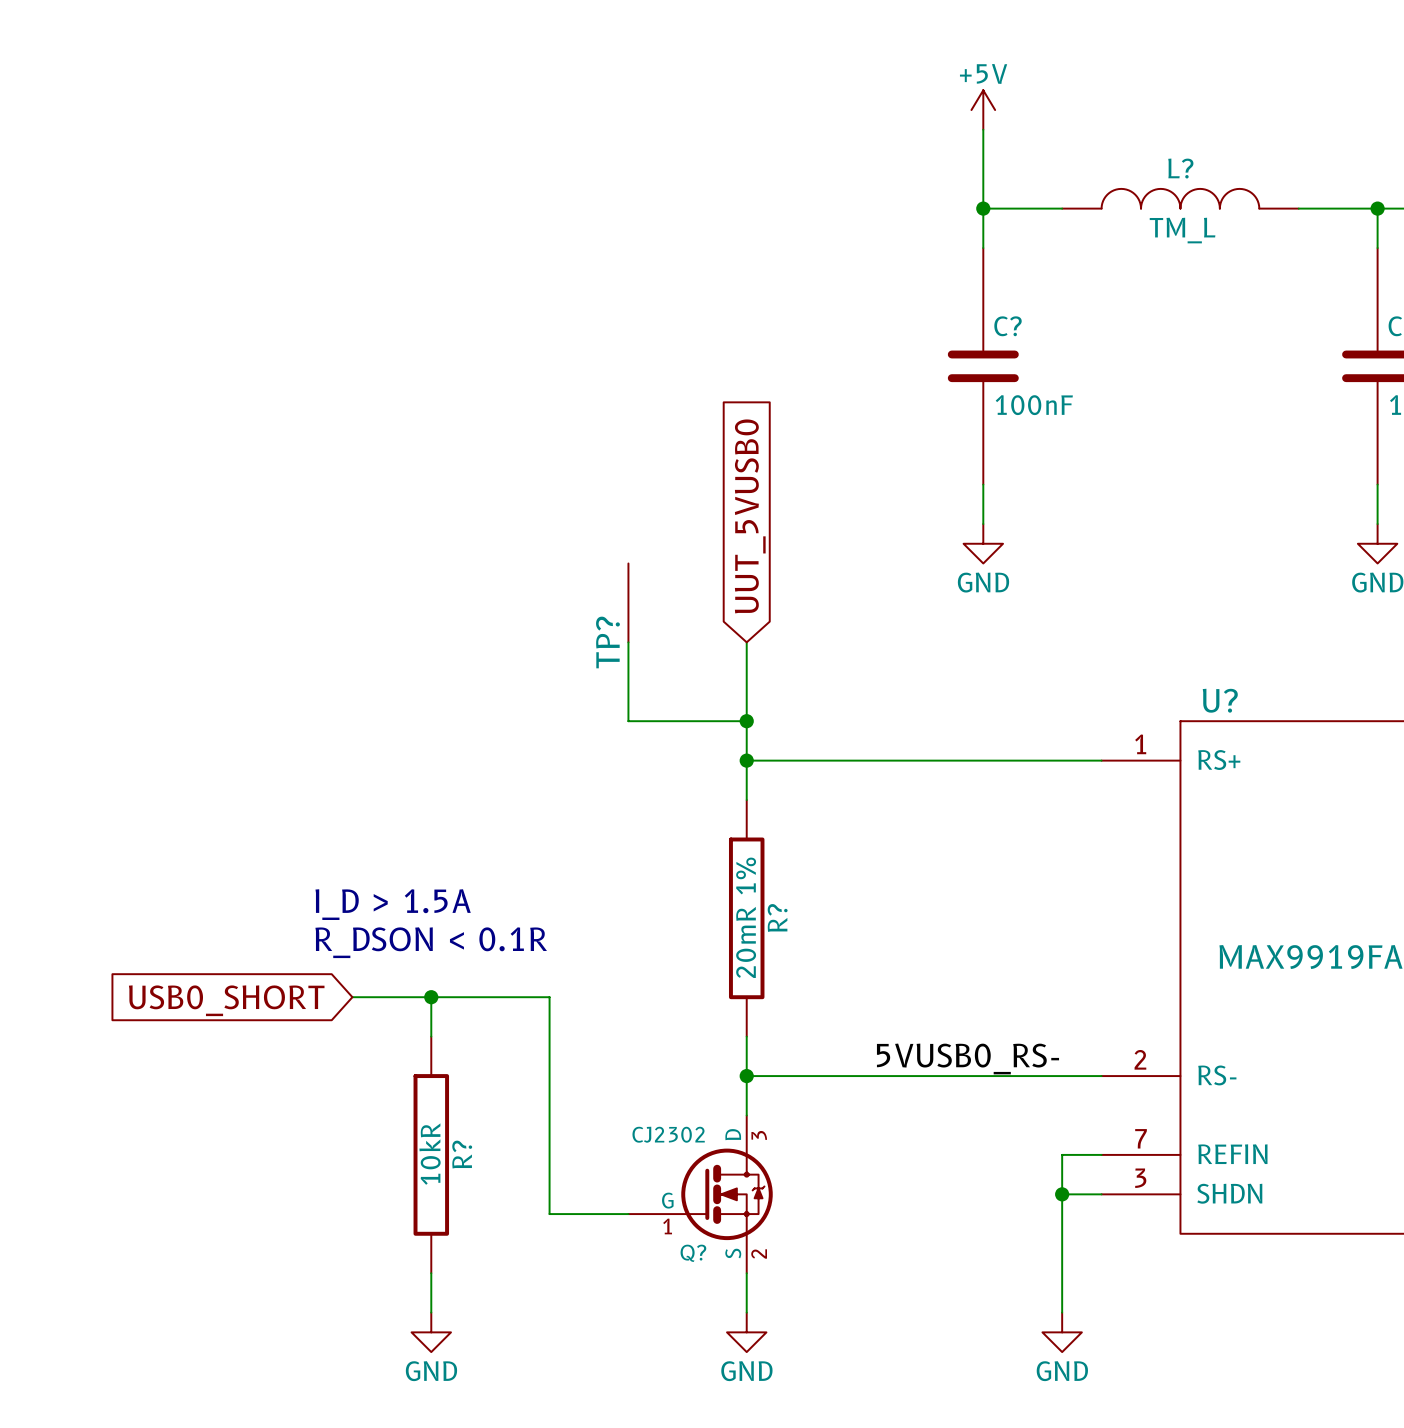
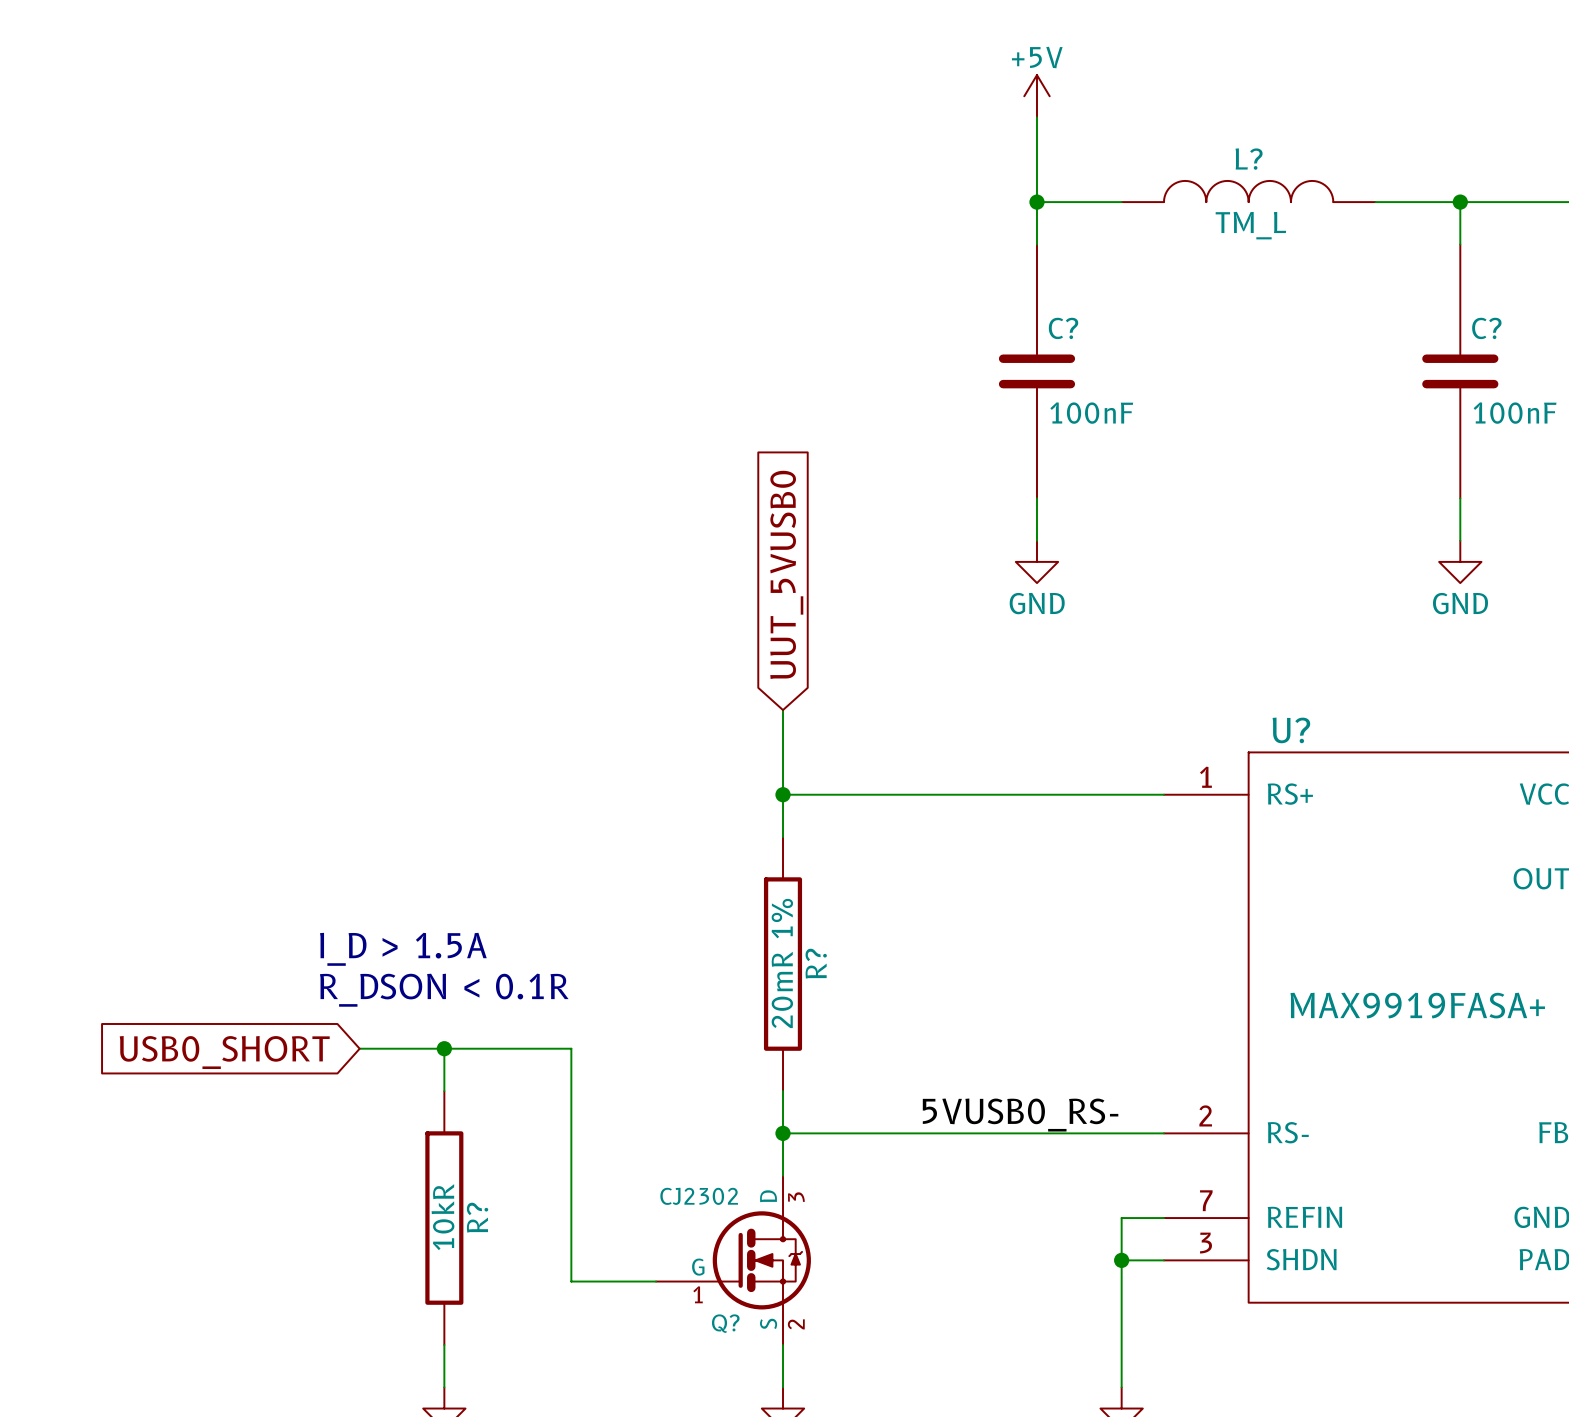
global label position: UUT_5VUSB0 (750, 516) -> UUT_5VUSB0 (786, 574)
TP?: (628, 602) -> none
wire: (628, 642) (628, 721) (746, 721) -> none
wire: (746, 642) (746, 681) -> none
junction: (746, 721) -> none

